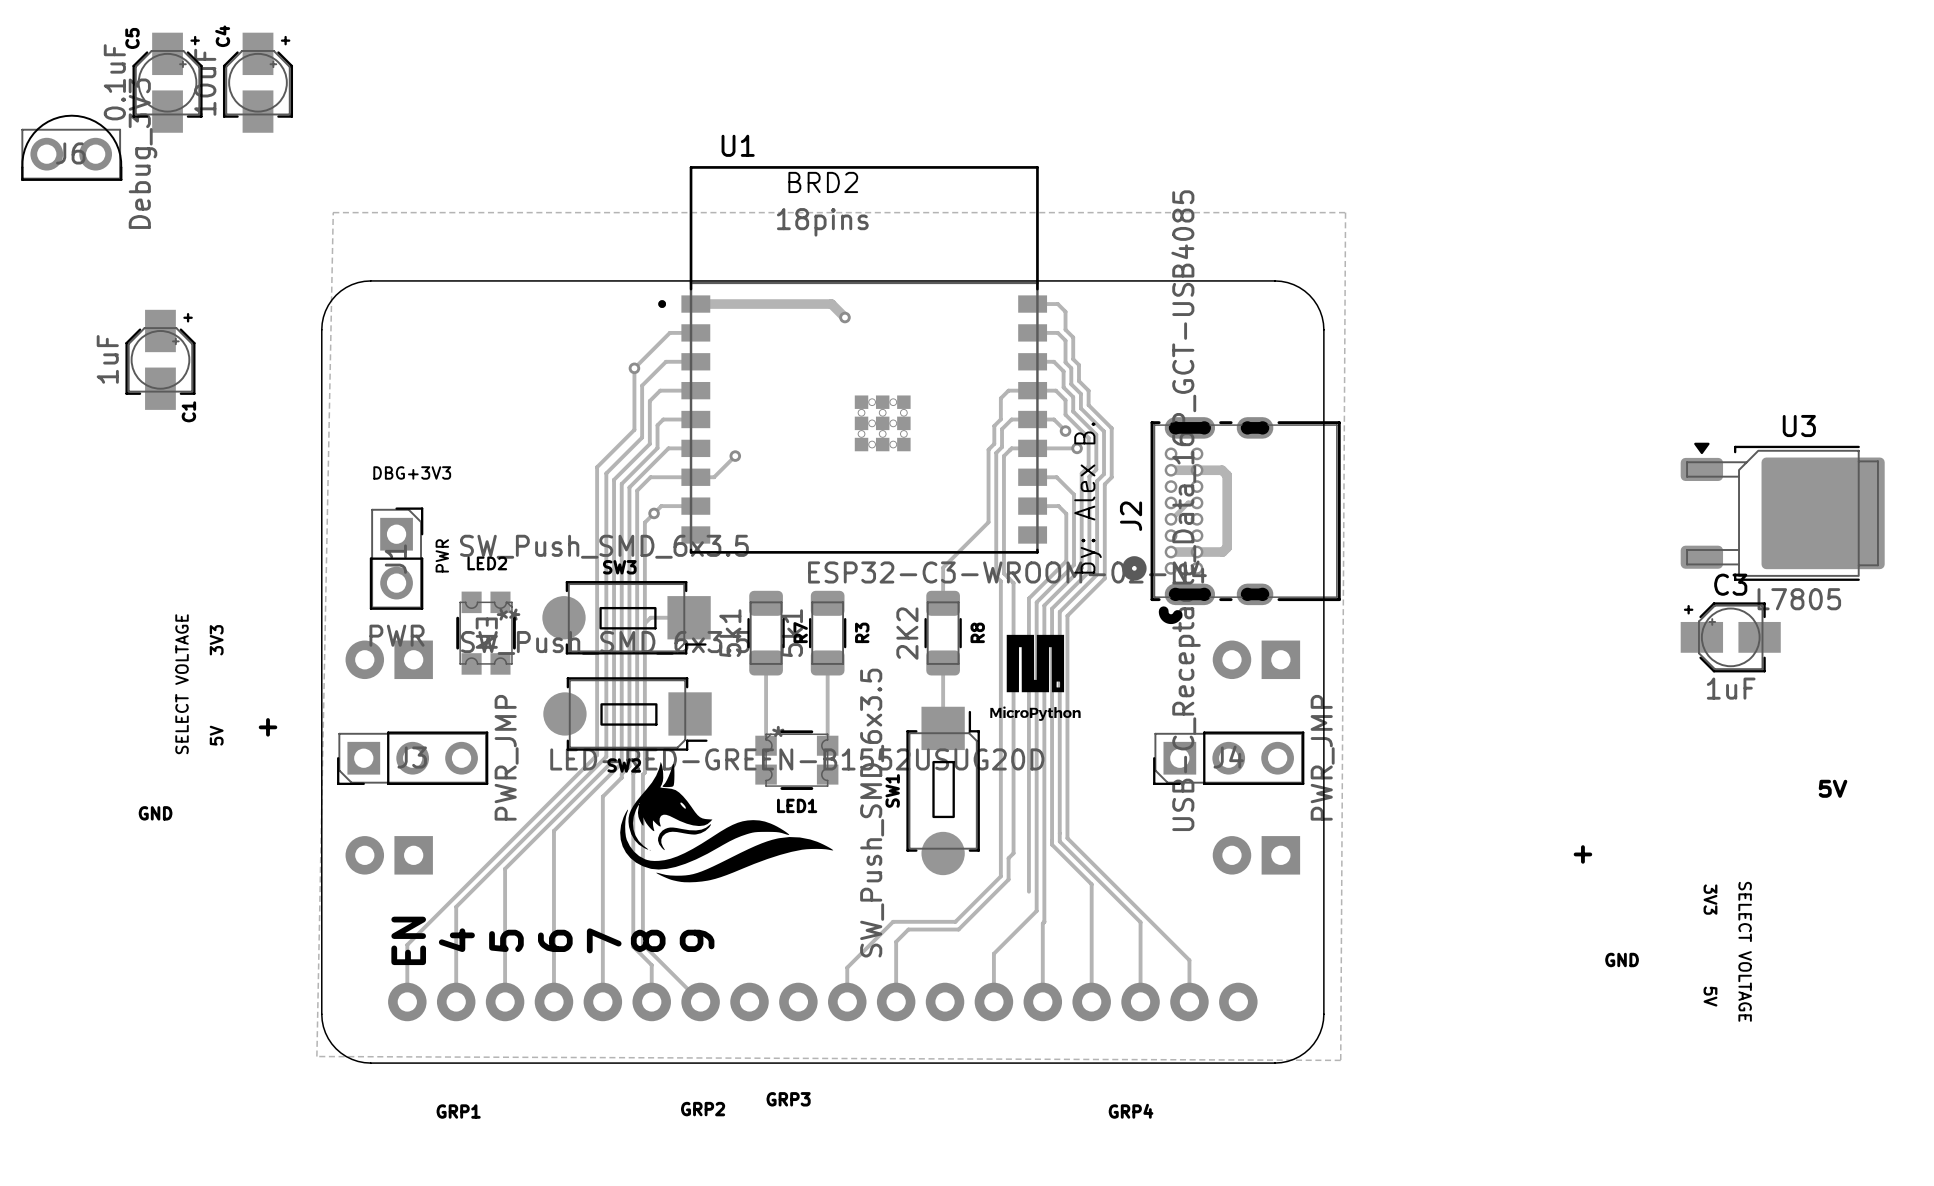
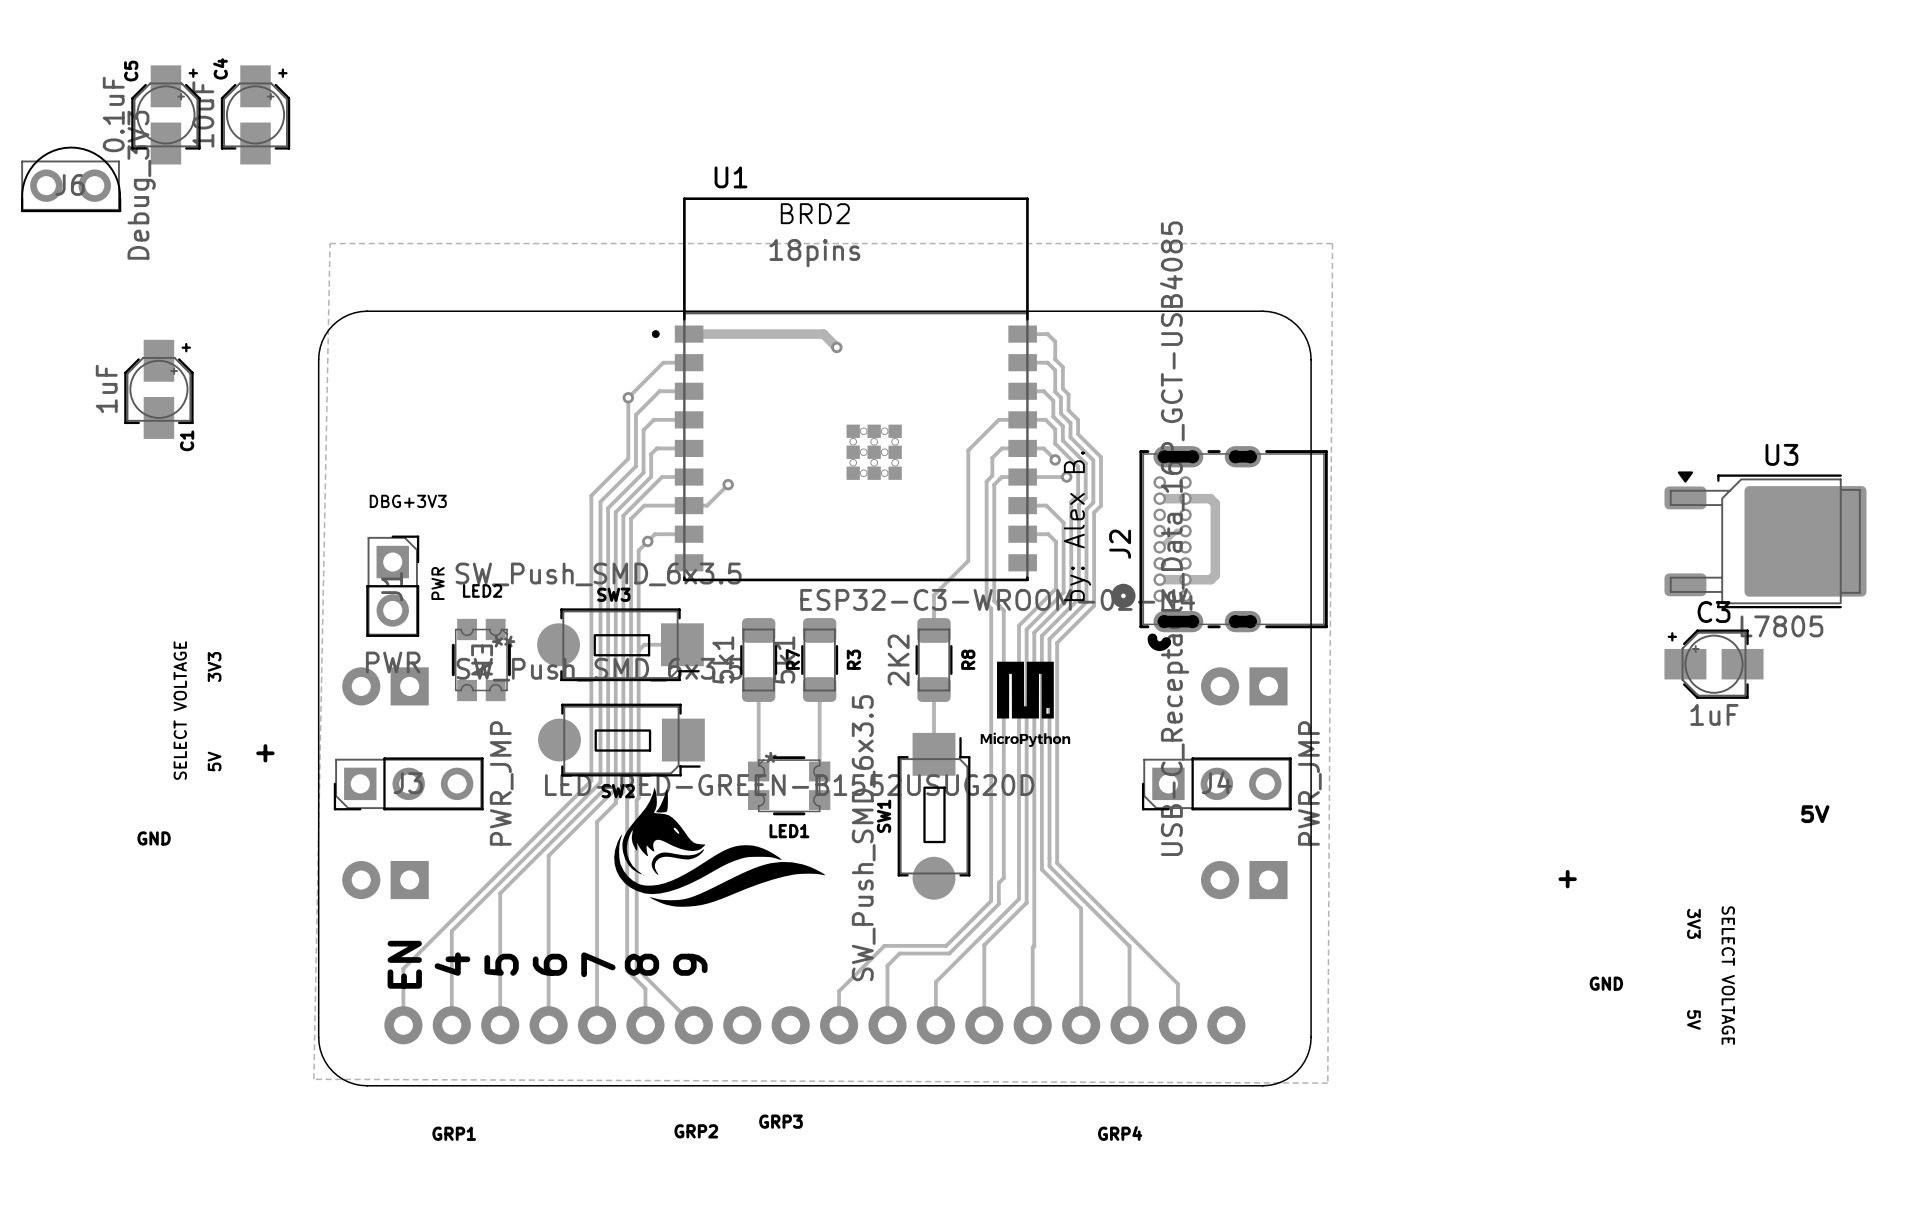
track: (1000, 398) (1000, 419) (994, 425) (994, 443) (988, 449) (988, 522) (977, 533) -> (991, 427) (968, 450) (968, 560)
track: (1028, 874) (1028, 891) -> (1019, 899) (935, 982) (935, 1025)
track: (1036, 878) (1036, 911) (993, 953) -> (1026, 902) (984, 945) (984, 977)

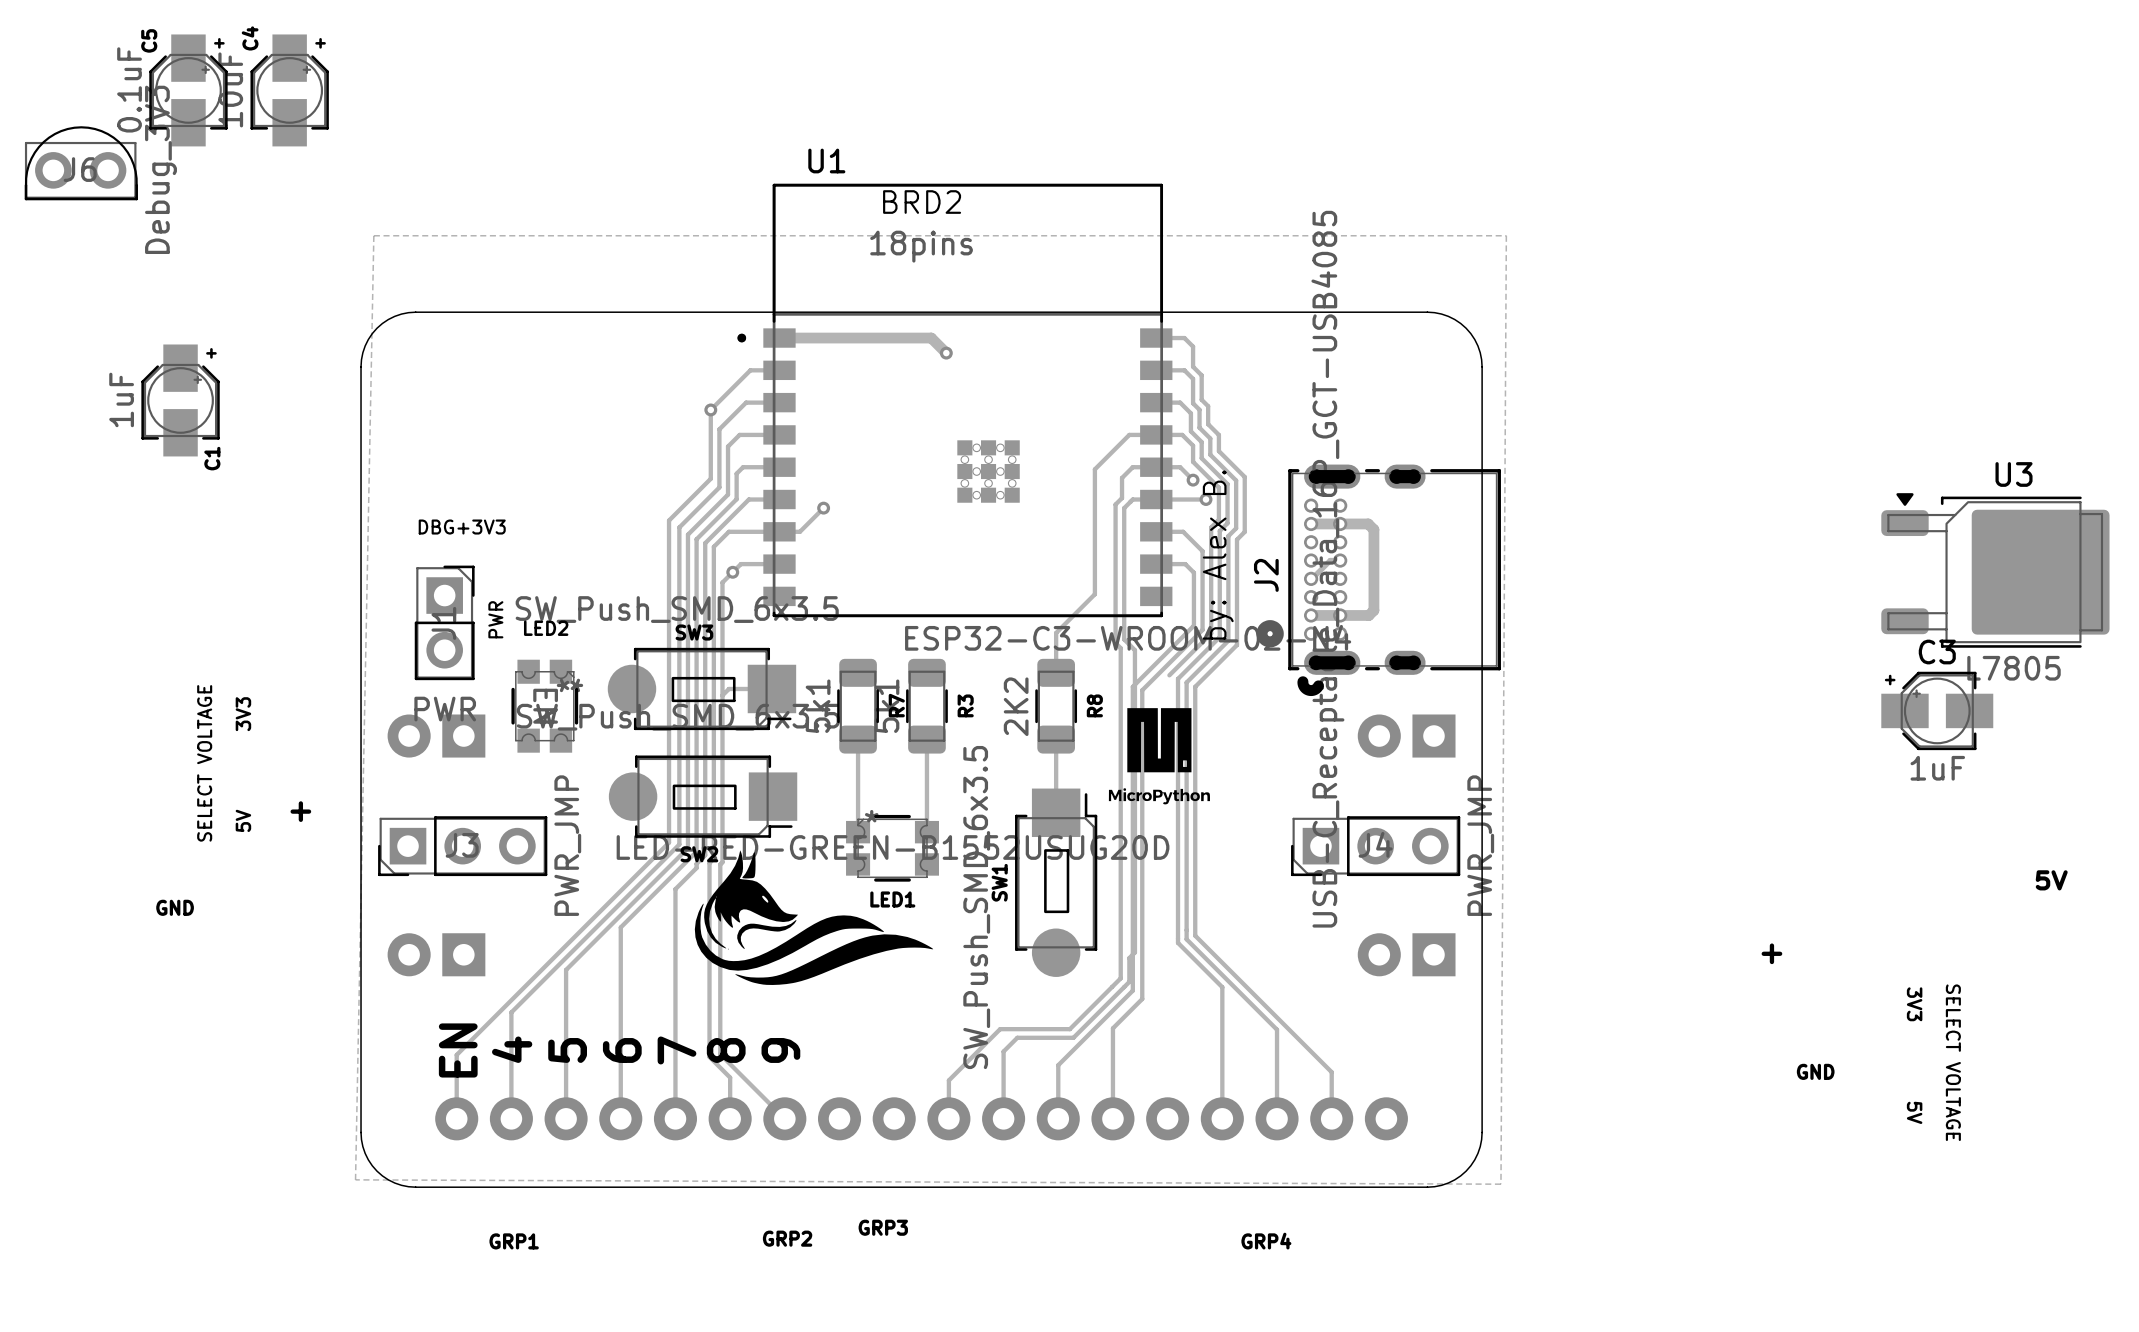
track: (1019, 625) (1019, 899) (935, 982) -> (1152, 667) (1132, 686) (1132, 990) (1058, 1065) (1058, 1070)
track: (1026, 629) (1026, 902) (1010, 919) -> (1160, 671) (1142, 690) (1142, 999)
track: (1034, 632) (1034, 946) -> none
track: (1034, 945) (1032, 947) (1032, 1025) -> none

